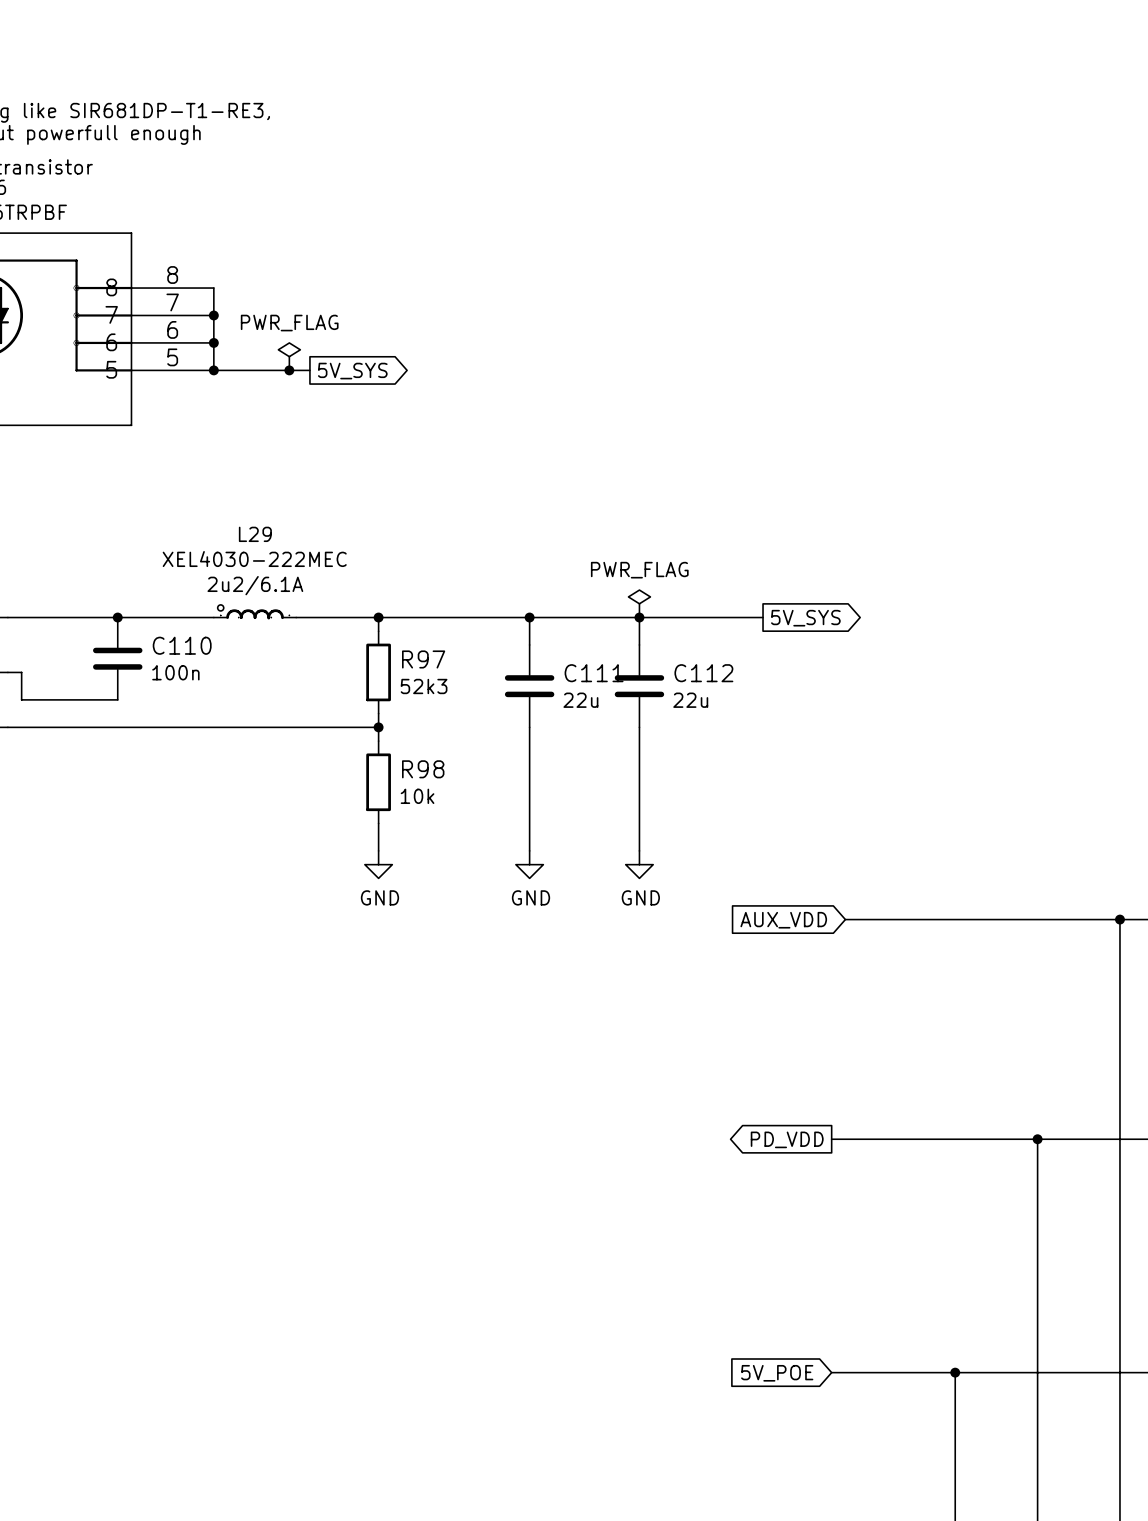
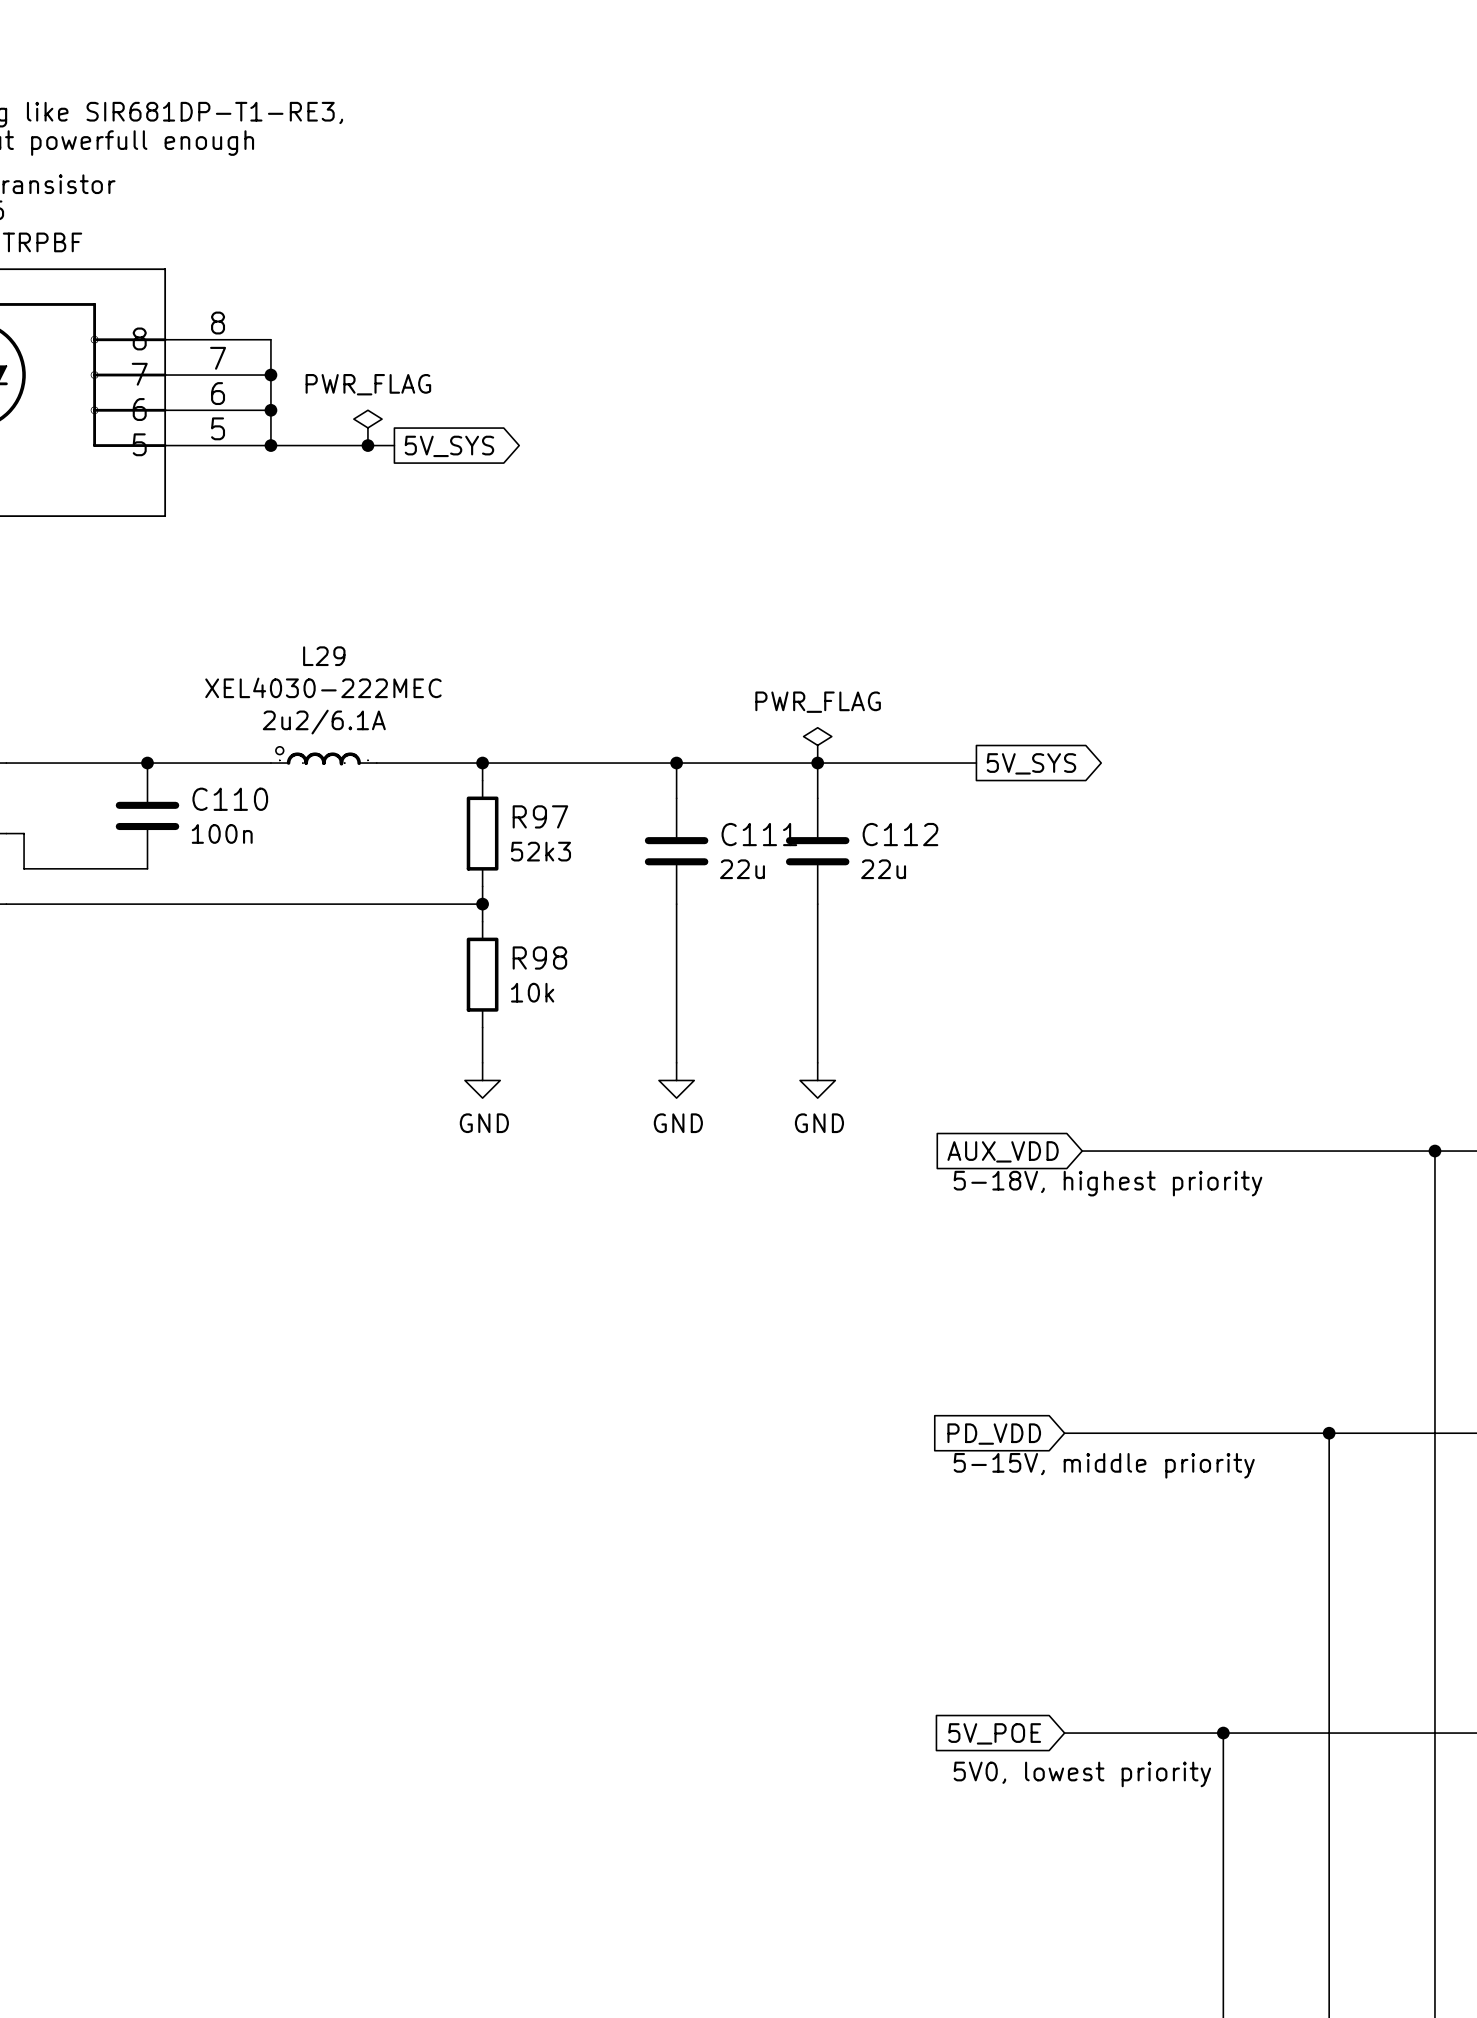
text: none -> 5-18V, highest priority (1107, 1183)
global label shape: output (787, 1139) -> input (994, 1434)
text: none -> 5-15V, middle priority (1104, 1465)
text: none -> 5V0, lowest priority (1082, 1774)

